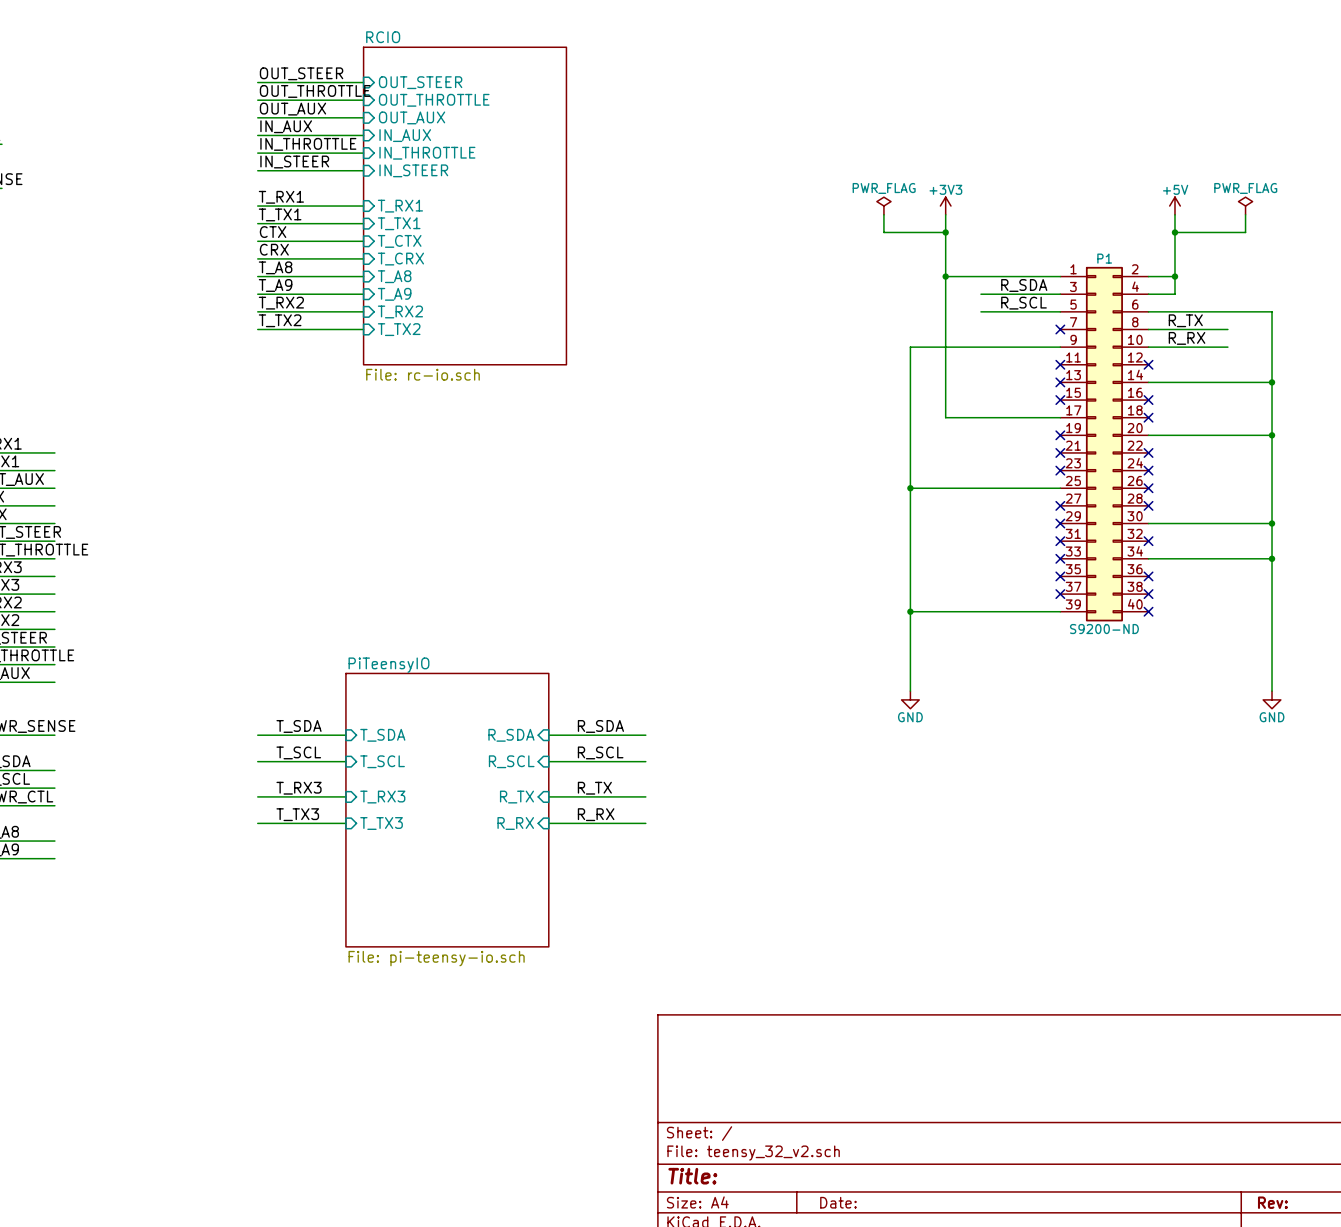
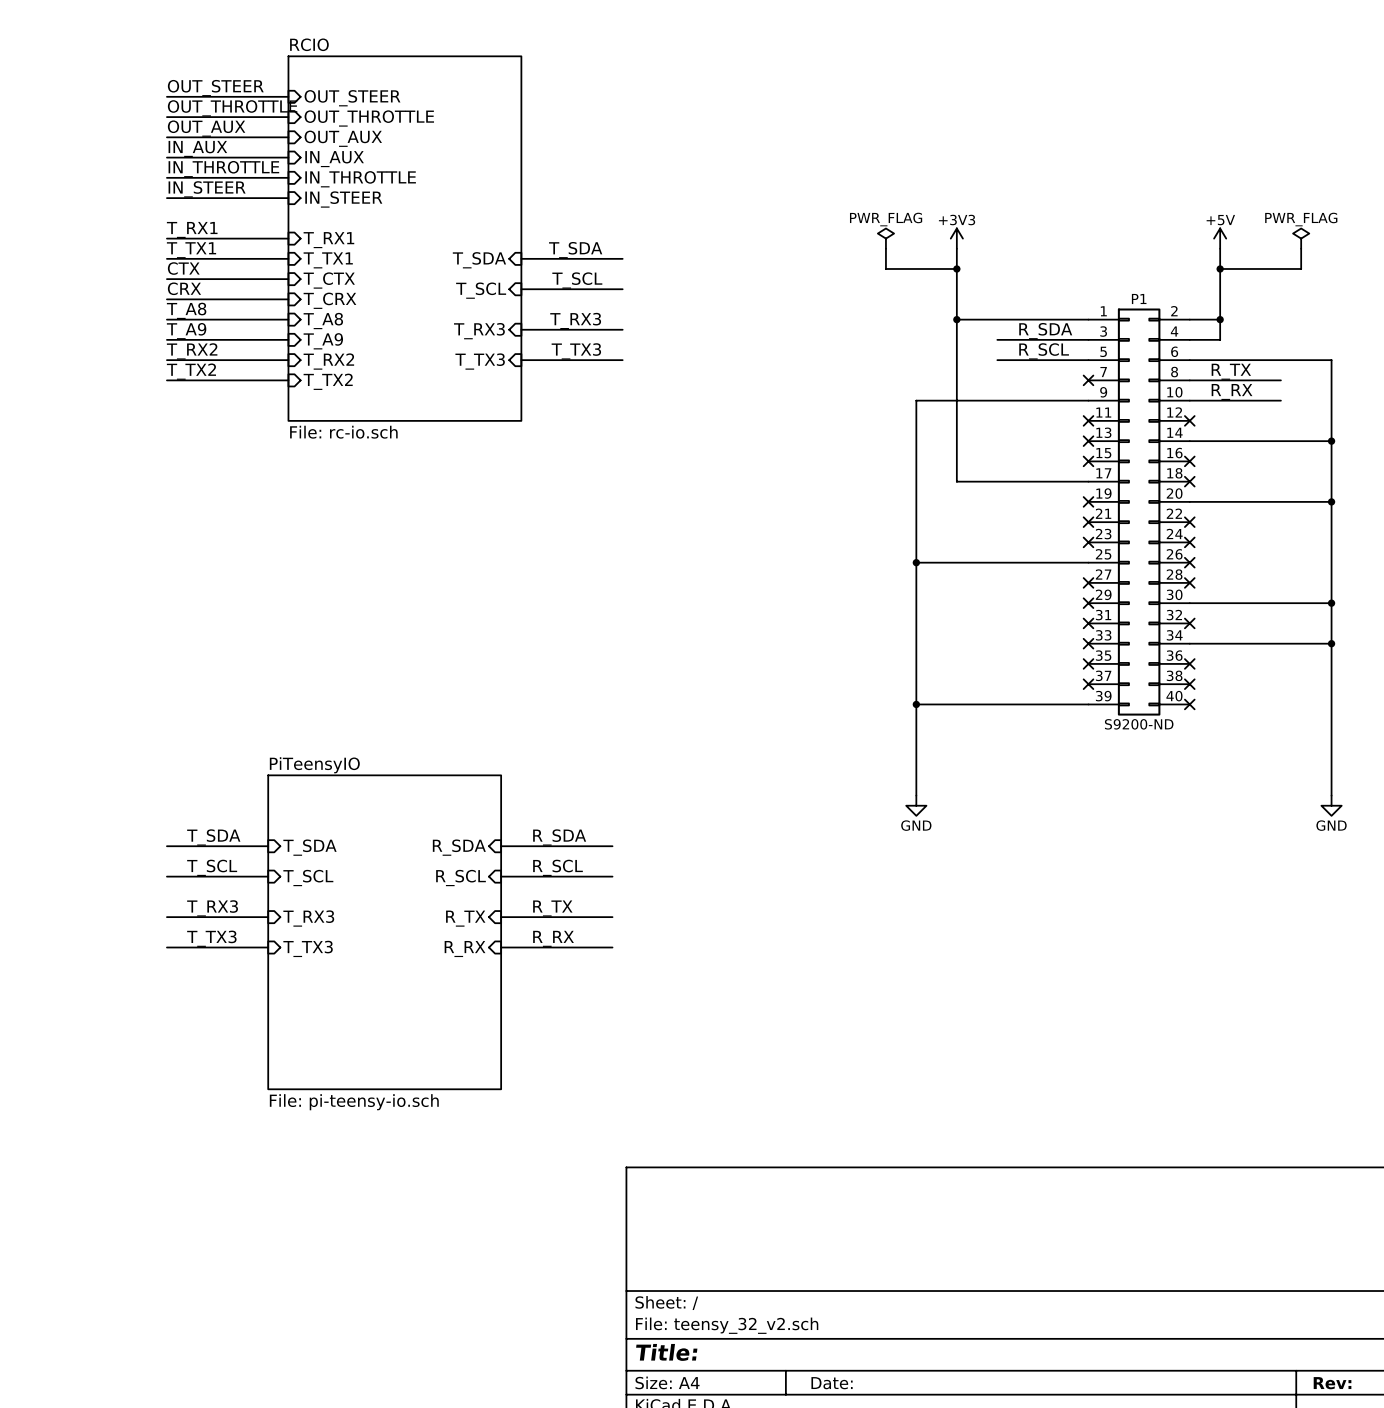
label: none -> T_SDA (575, 250)
sheet pin: none -> T_SDA (479, 260)
wire: none -> (521, 258) (622, 258)
label: none -> T_SCL (577, 280)
sheet pin: none -> T_SCL (481, 290)
wire: none -> (521, 289) (622, 289)
label: none -> T_RX3 (575, 321)
sheet pin: none -> T_RX3 (479, 331)
wire: none -> (521, 329) (622, 329)
label: none -> T_TX3 (576, 351)
sheet pin: none -> T_TX3 (480, 361)
wire: none -> (521, 360) (622, 360)

